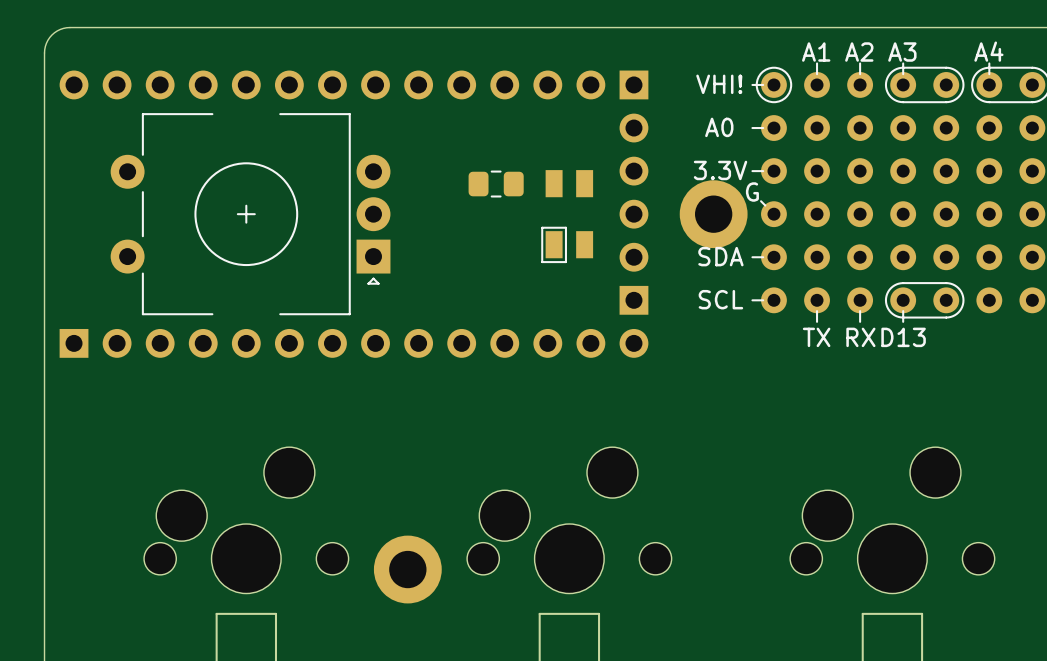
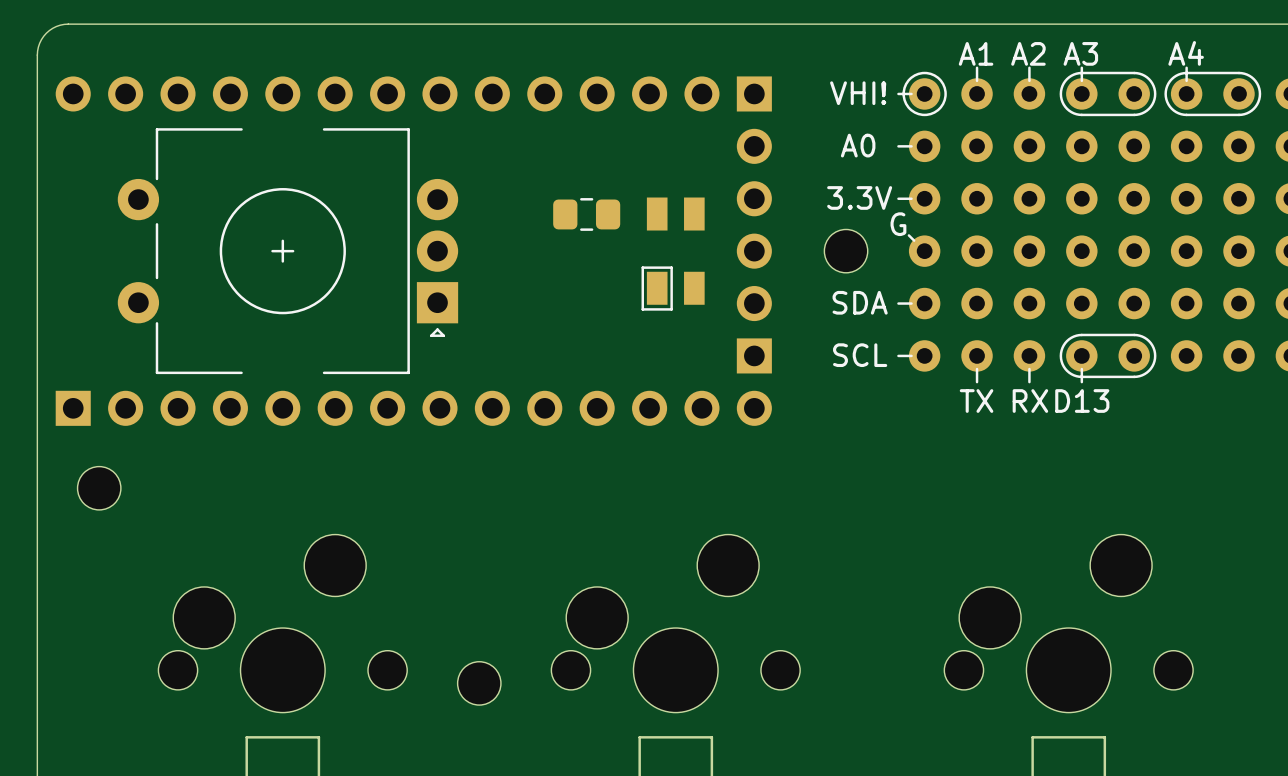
part footprint: [679, 180, 748, 249] -> [824, 229, 868, 273]
part: none -> (99, 488)
part footprint: [373, 535, 442, 604] -> [457, 661, 501, 706]

